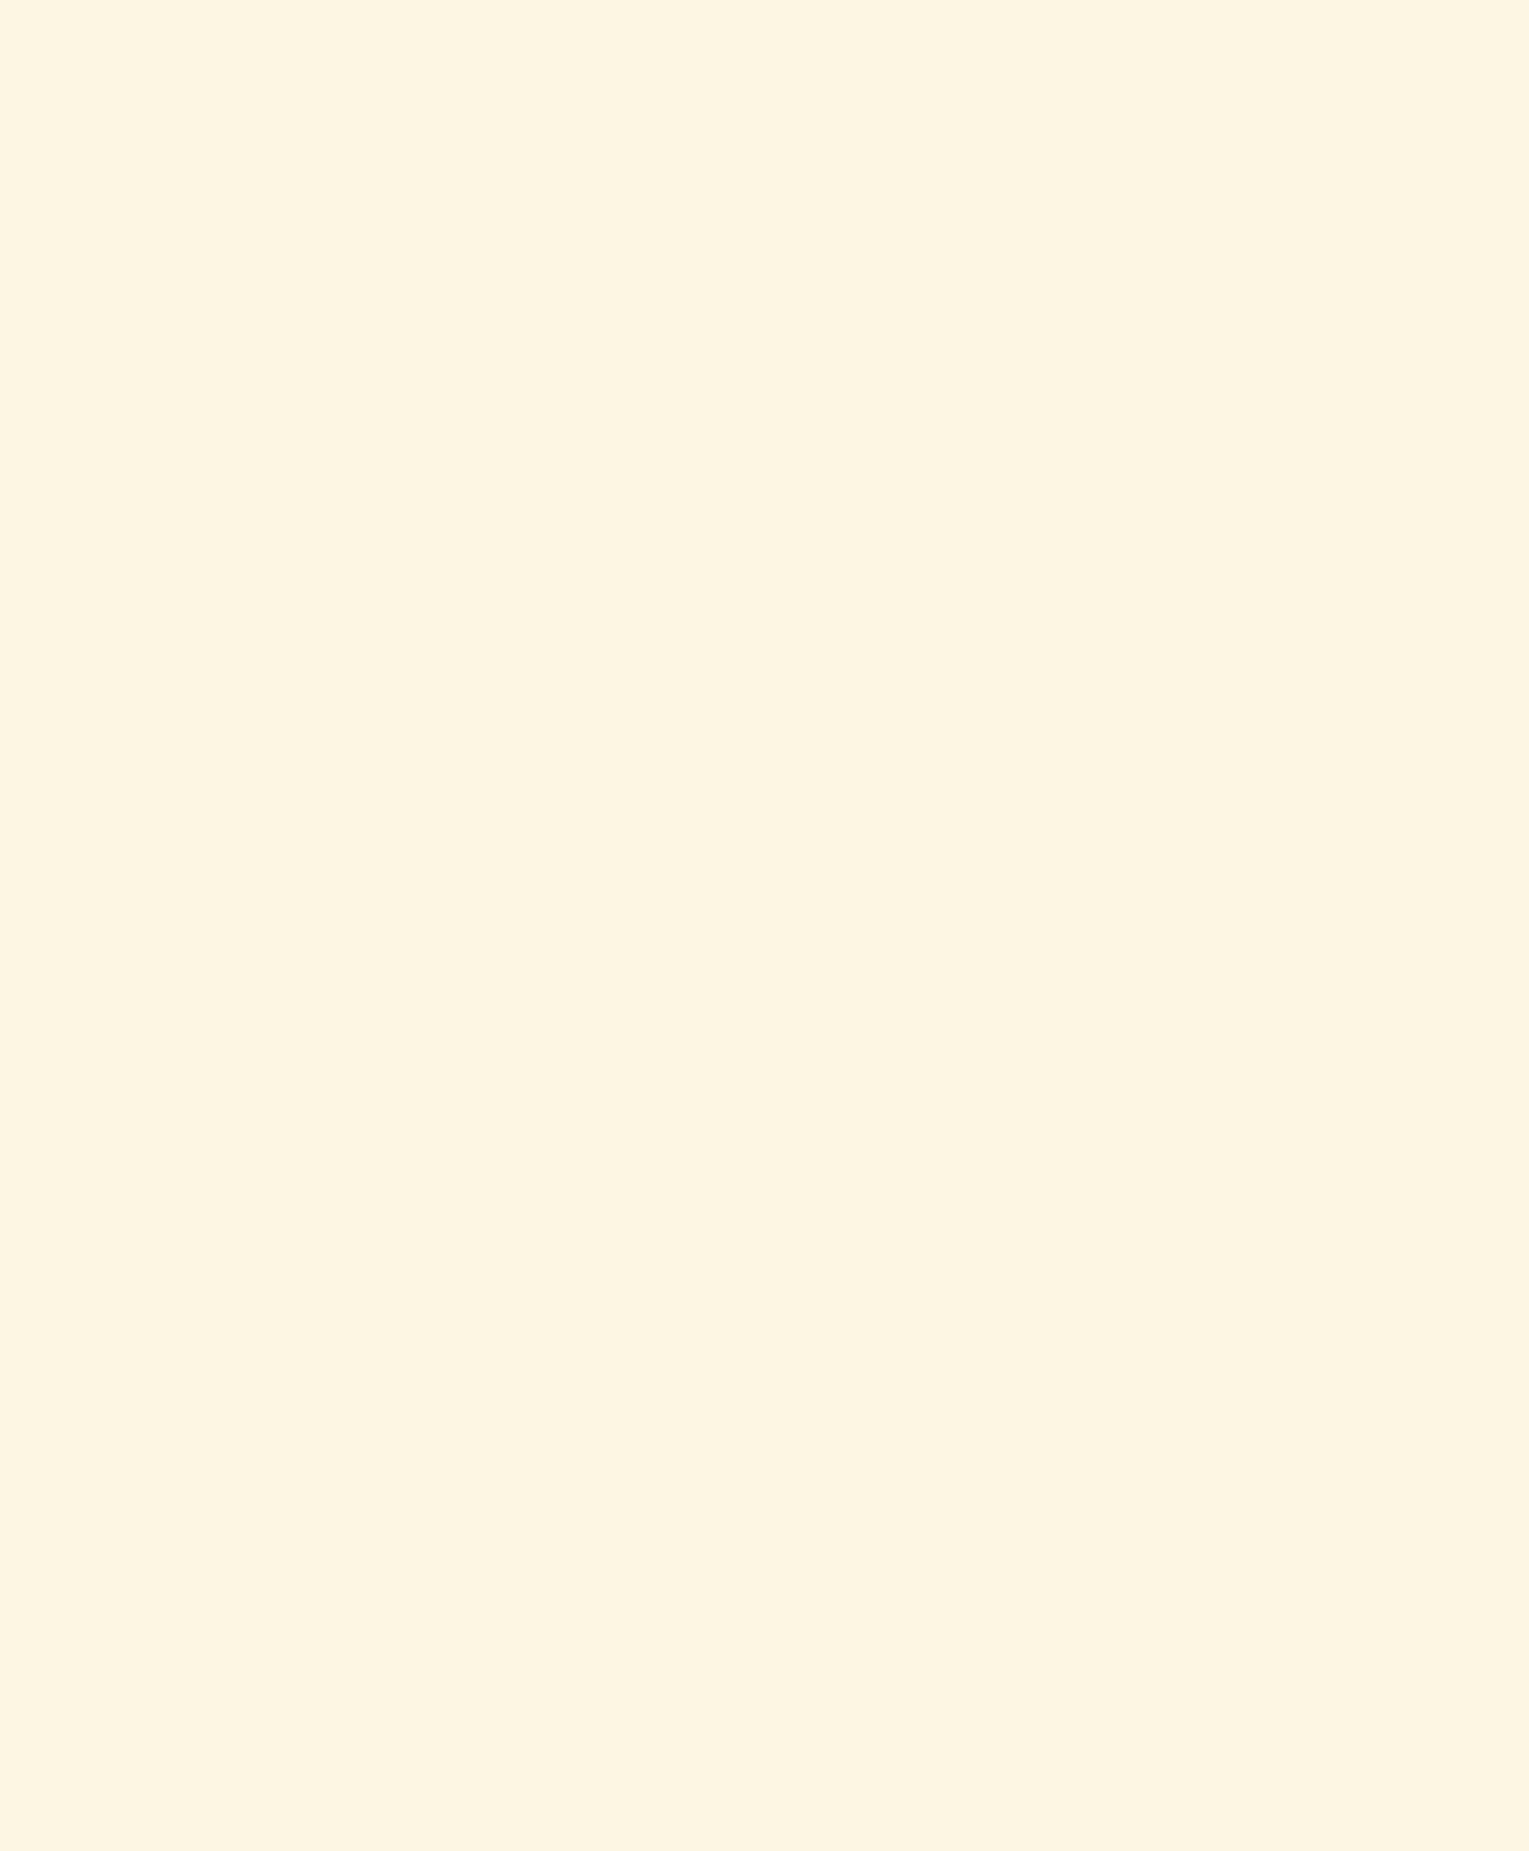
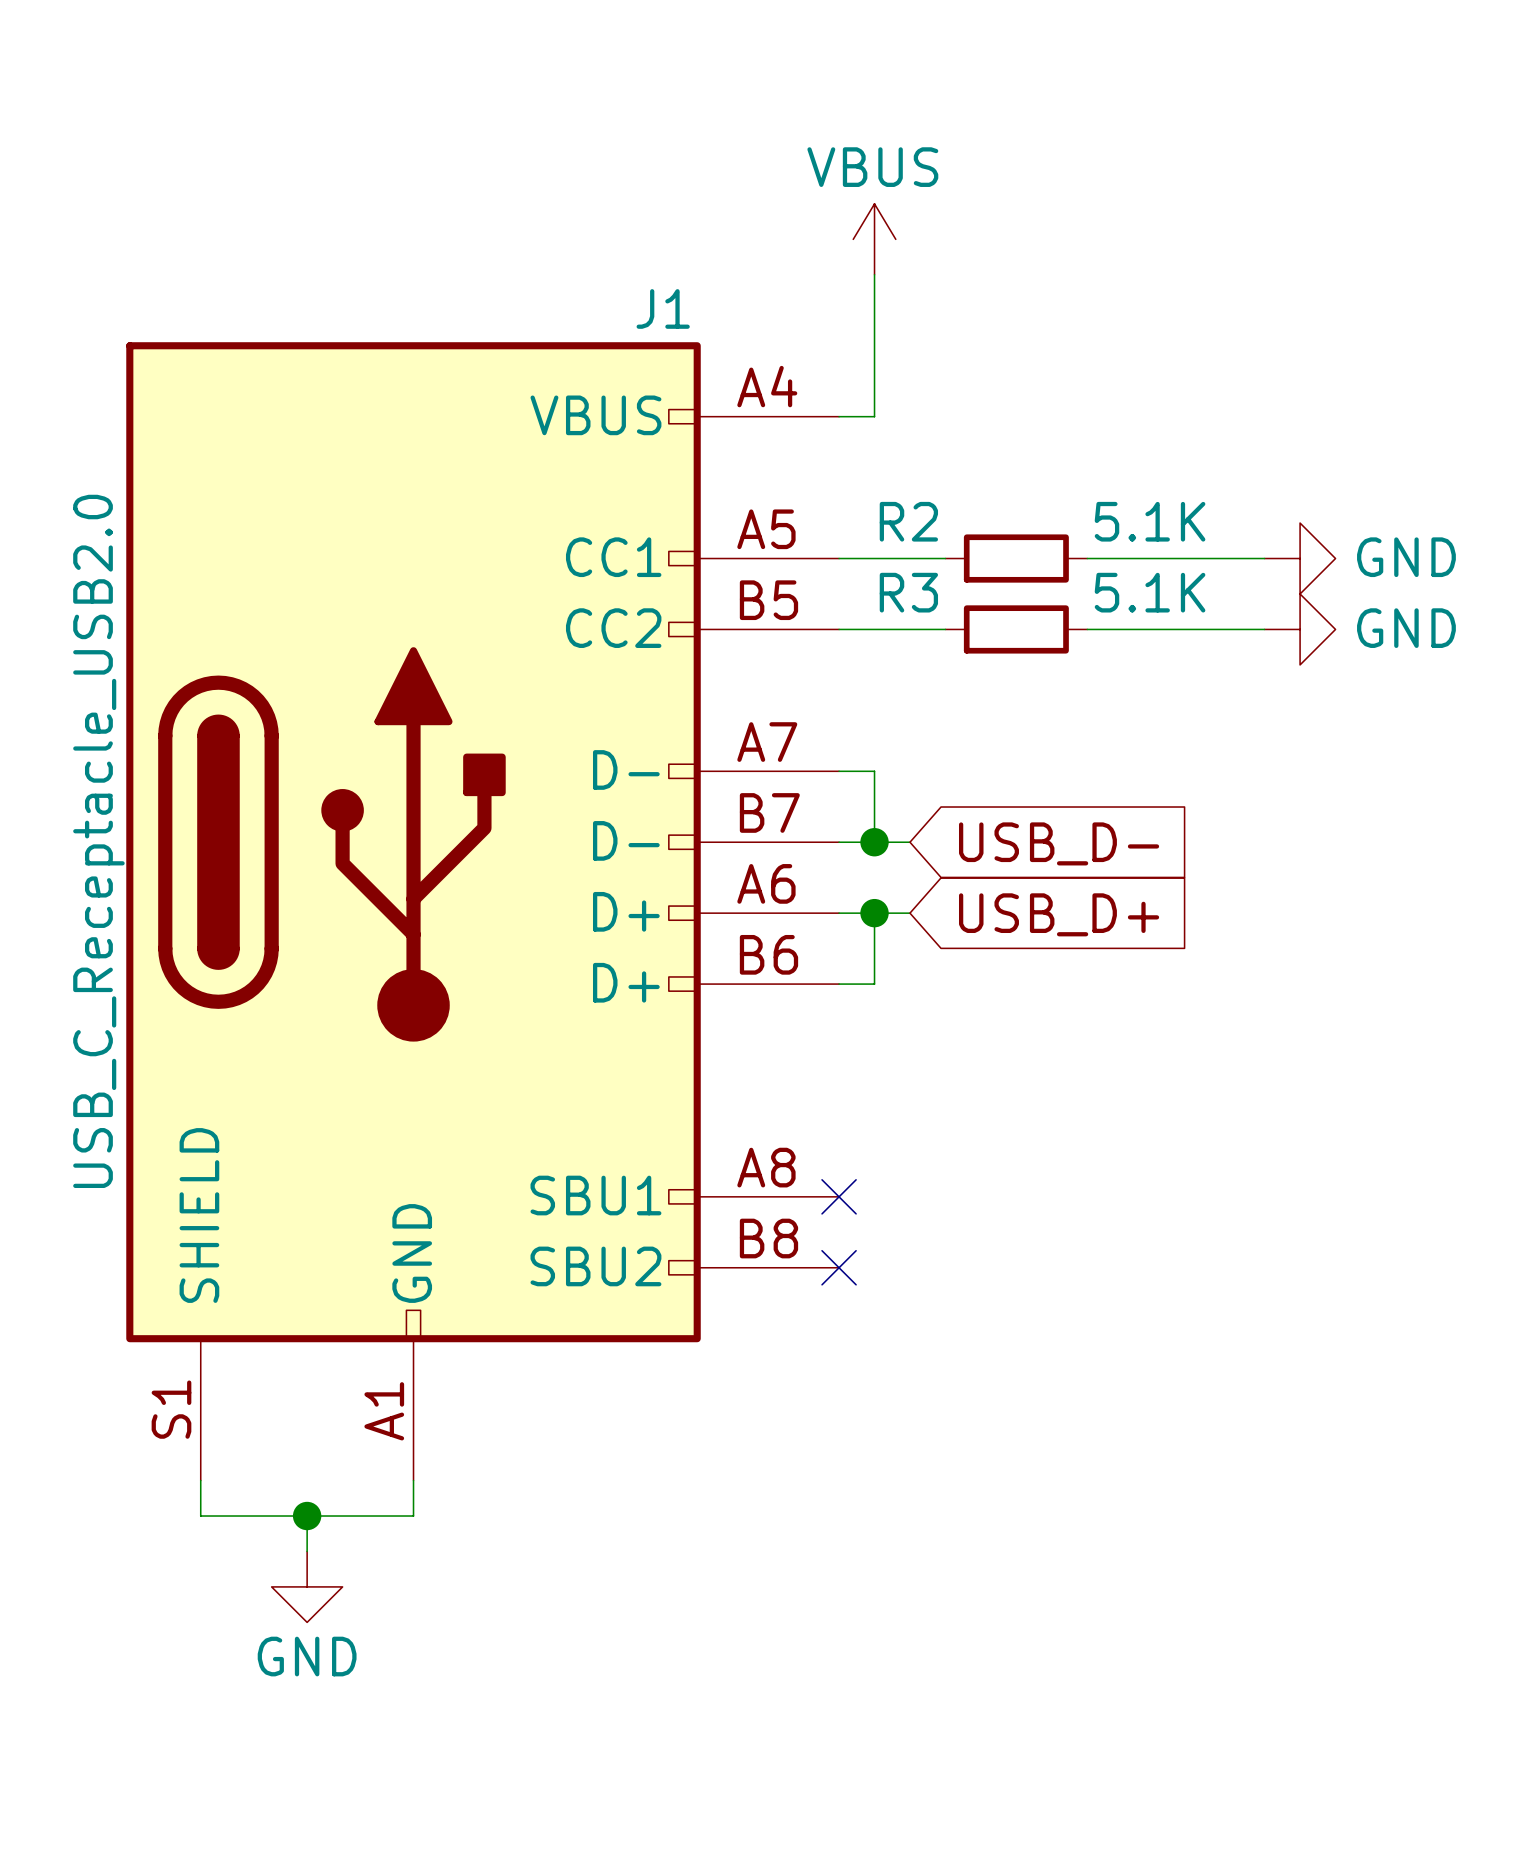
power symbol: none -> VBUS (874, 239)
wire: none -> (874, 274) (874, 416) (839, 416)
wire: none -> (839, 558) (945, 558)
R2: none -> 5.1K (1016, 558)
wire: none -> (1087, 558) (1264, 558)
power symbol: none -> GND (1300, 558)
wire: none -> (839, 629) (945, 629)
R3: none -> 5.1K (1016, 629)
wire: none -> (1087, 629) (1264, 629)
power symbol: none -> GND (1300, 629)
wire: none -> (839, 771) (874, 771) (874, 842)
wire: none -> (839, 842) (909, 842)
junction: none -> (874, 842)
global label: none -> USB_D- (1059, 843)
J1: none -> USB_C_Receptacle_USB2.0 (482, 911)
wire: none -> (839, 913) (909, 913)
wire: none -> (874, 913) (874, 984) (839, 984)
junction: none -> (874, 913)
global label: none -> USB_D+ (1059, 914)
no-connect mark: none -> (839, 1196)
no-connect mark: none -> (839, 1267)
wire: none -> (200, 1480) (200, 1516) (413, 1516) (413, 1480)
wire: none -> (307, 1516) (307, 1551)
junction: none -> (307, 1516)
power symbol: none -> GND (307, 1586)

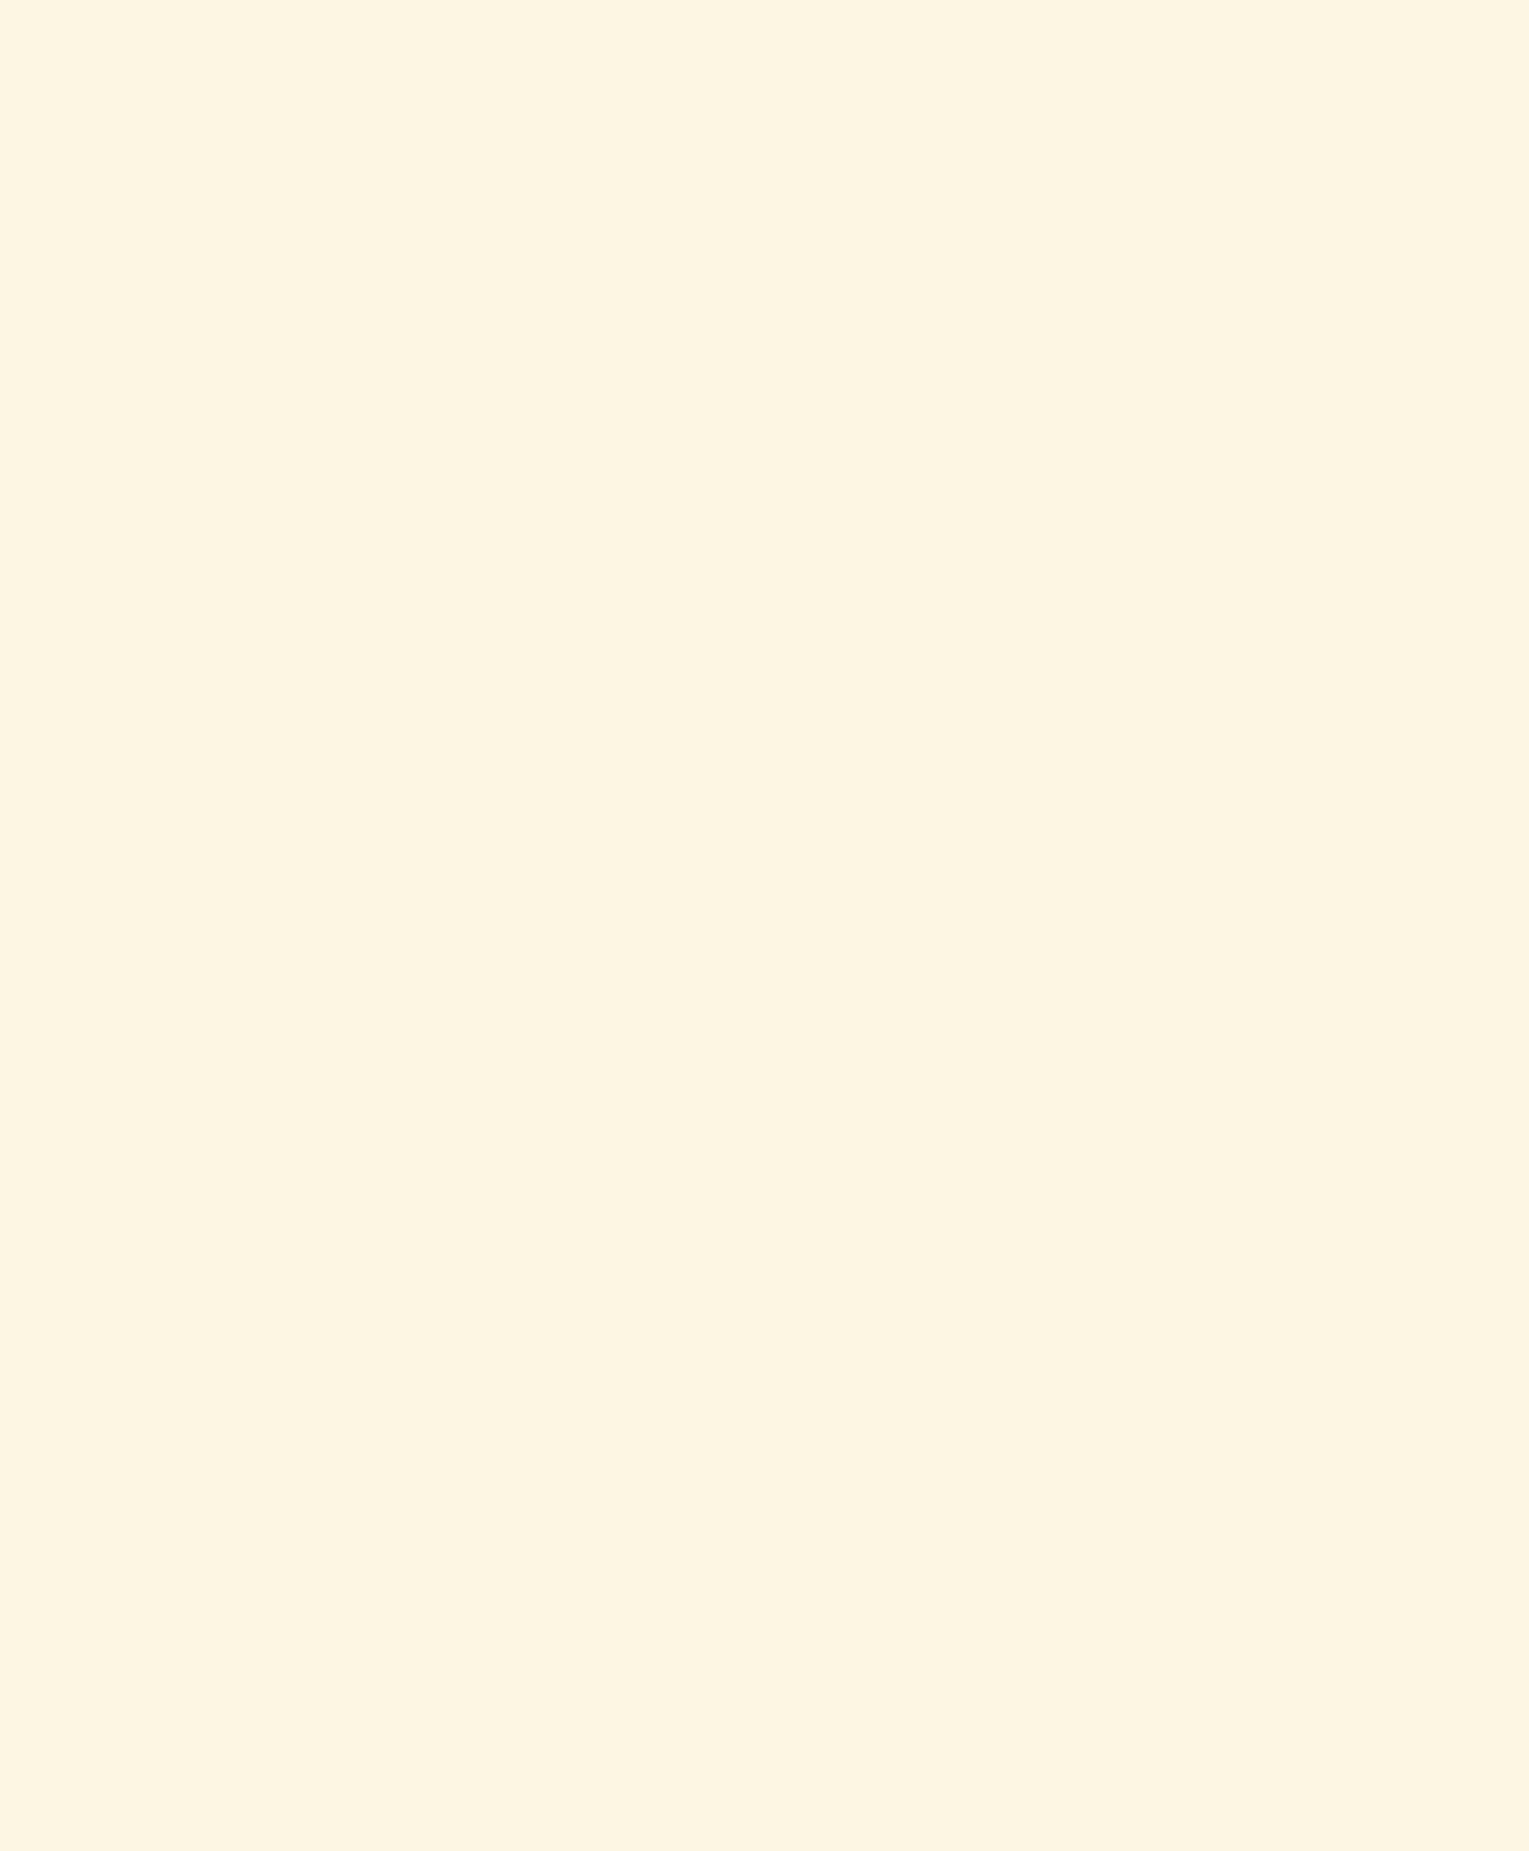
power symbol: VBUS (874, 239) -> none
wire: (874, 274) (874, 416) (839, 416) -> none
wire: (839, 558) (945, 558) -> none
R2: 5.1K (1016, 558) -> none
wire: (1087, 558) (1264, 558) -> none
power symbol: GND (1300, 558) -> none
wire: (839, 629) (945, 629) -> none
R3: 5.1K (1016, 629) -> none
wire: (1087, 629) (1264, 629) -> none
power symbol: GND (1300, 629) -> none
wire: (839, 771) (874, 771) (874, 842) -> none
wire: (839, 842) (909, 842) -> none
junction: (874, 842) -> none
global label: USB_D- (1059, 843) -> none
J1: USB_C_Receptacle_USB2.0 (482, 911) -> none
wire: (839, 913) (909, 913) -> none
wire: (874, 913) (874, 984) (839, 984) -> none
junction: (874, 913) -> none
global label: USB_D+ (1059, 914) -> none
no-connect mark: (839, 1196) -> none
no-connect mark: (839, 1267) -> none
wire: (200, 1480) (200, 1516) (413, 1516) (413, 1480) -> none
wire: (307, 1516) (307, 1551) -> none
junction: (307, 1516) -> none
power symbol: GND (307, 1586) -> none

